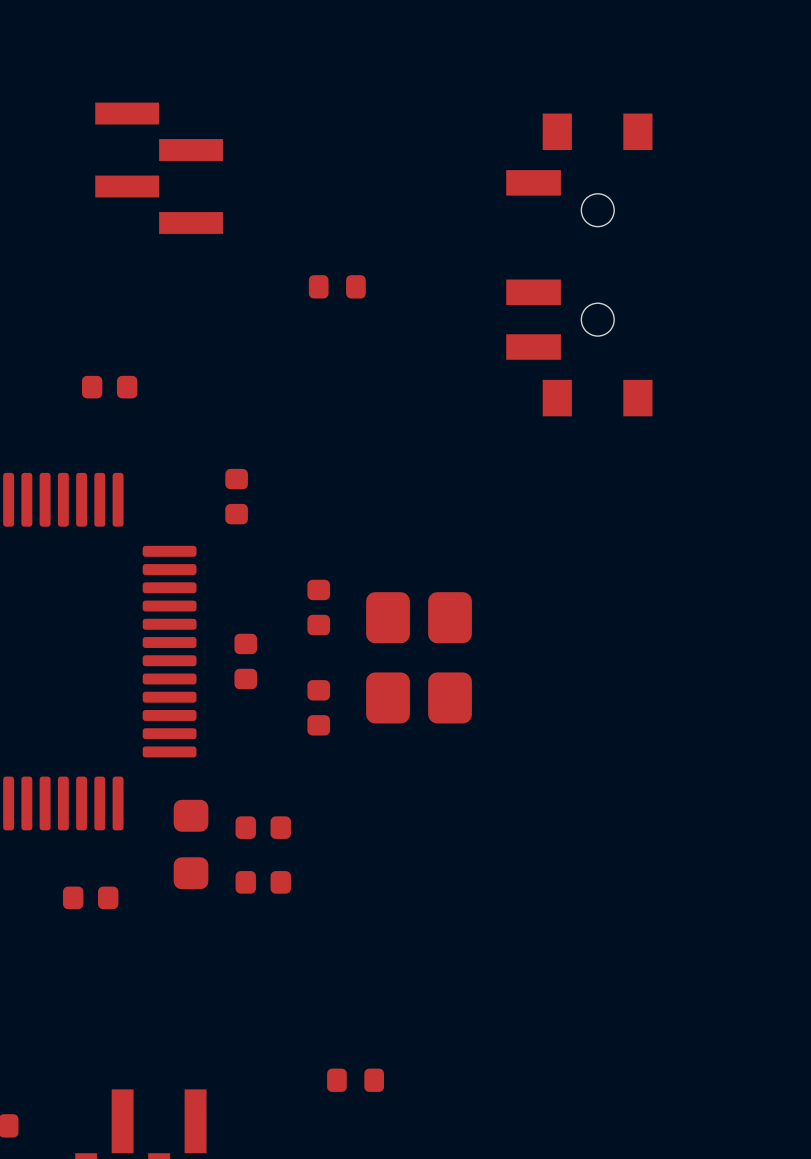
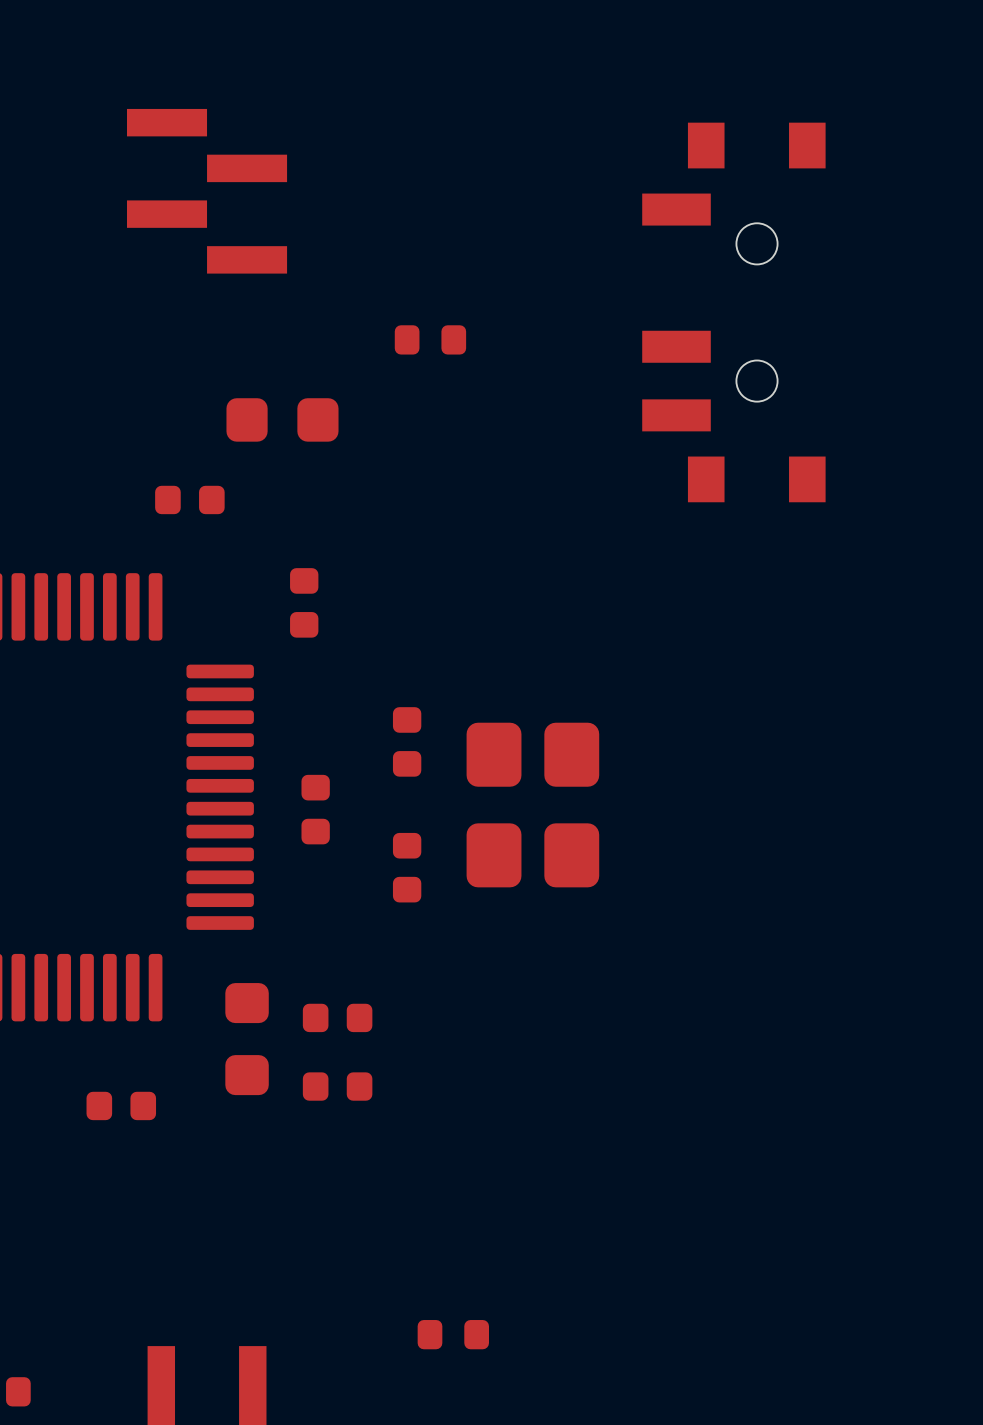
part: none -> (282, 419)
part position: (109, 387) -> (189, 499)

